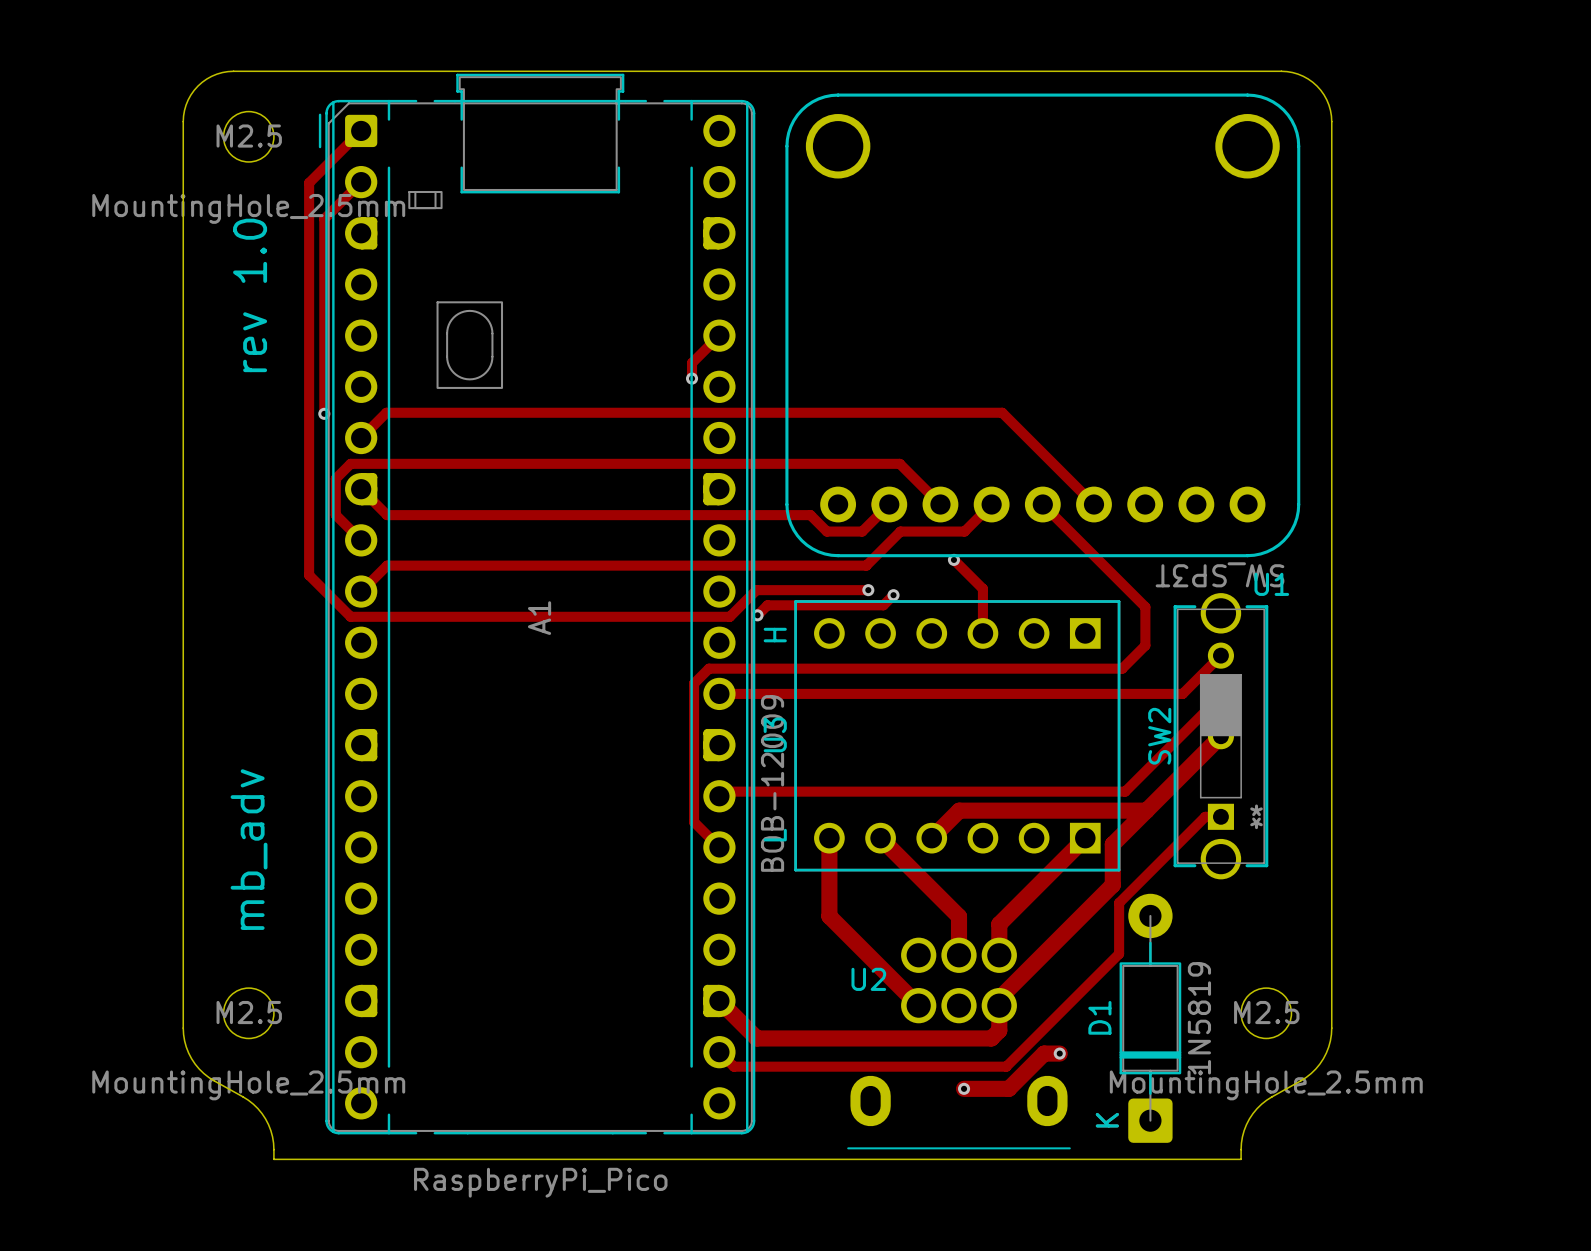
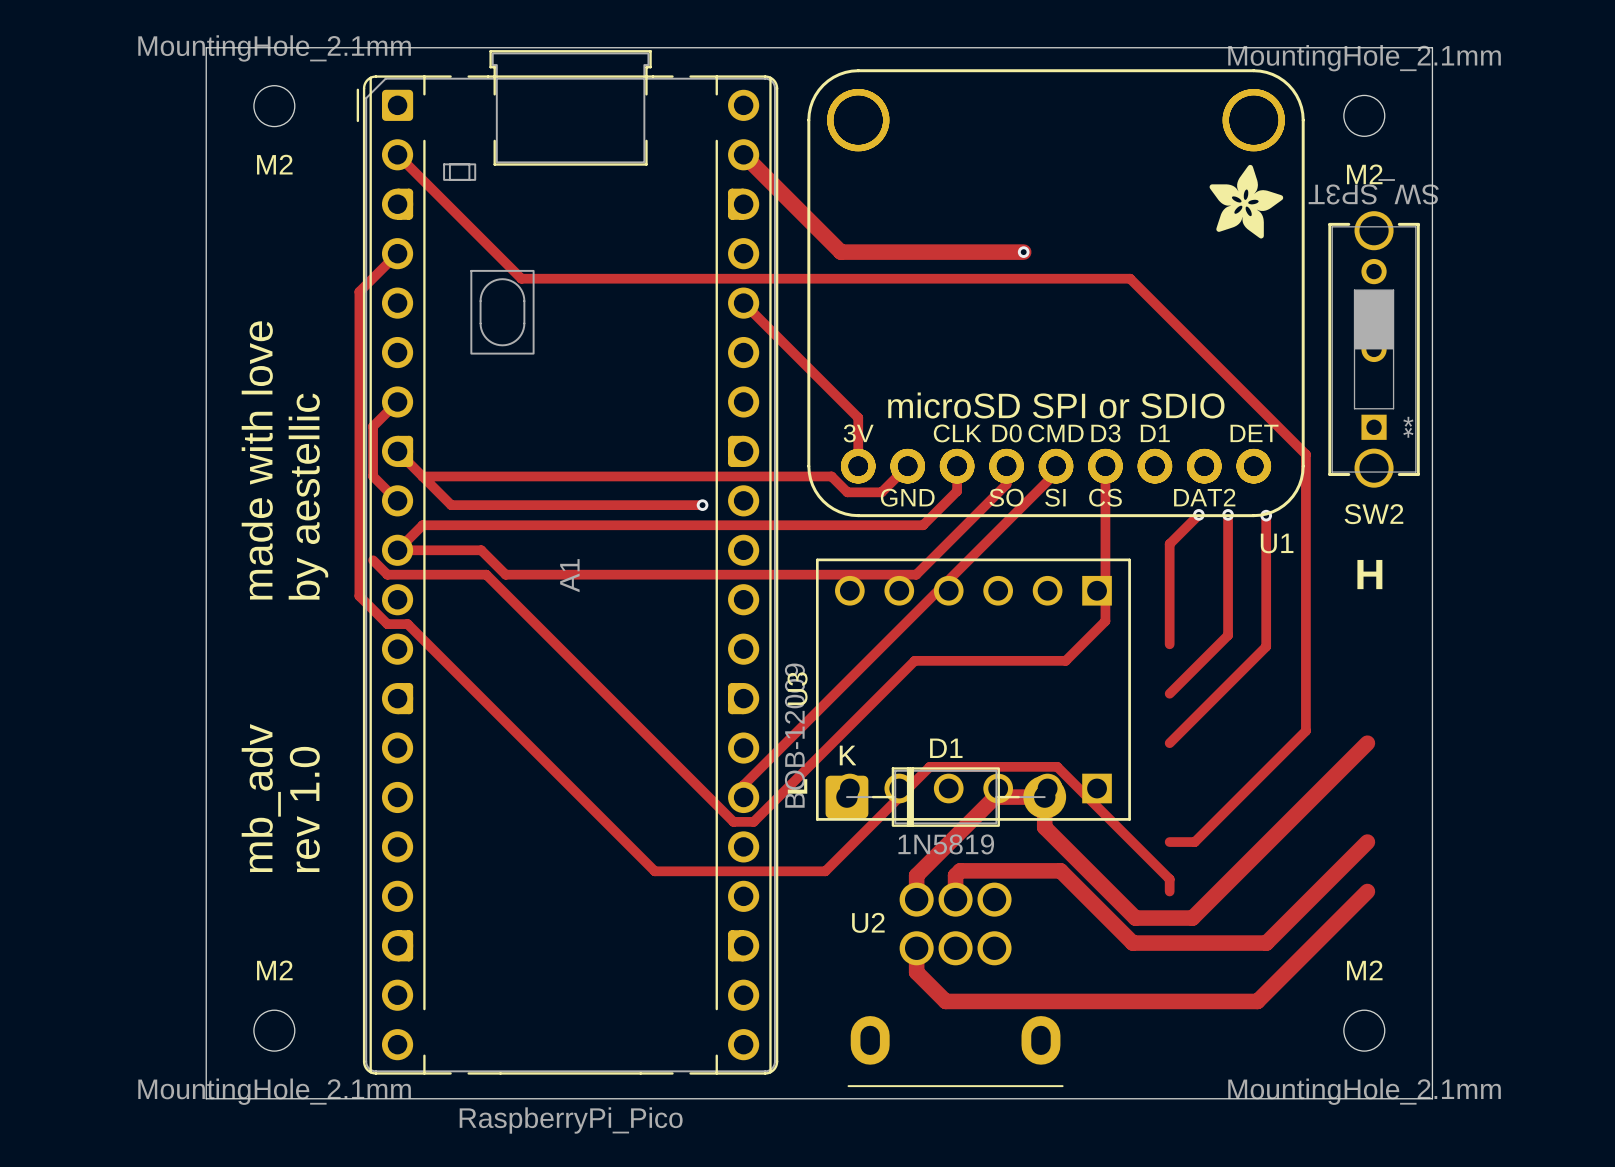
board edge: (233, 71) (211, 76) (198, 86) (186, 105) (183, 121) (183, 1028) (188, 1053) (199, 1069) (208, 1077) (248, 1100) (262, 1113) (272, 1136) (273, 1159) -> (274, 47) (206, 47) (206, 1098) (313, 1098)
board edge: (1281, 71) (1298, 74) (1317, 86) (1326, 99) (1331, 121) (1331, 1028) (1326, 1053) (1315, 1069) (1306, 1077) (1266, 1100) (1252, 1113) (1242, 1136) (1241, 1159) -> (1286, 47) (1432, 47) (1432, 1098) (1247, 1098)
track: (361, 130) (309, 182) (309, 575) (335, 601) -> none
M2: none -> MountingHole_2.1mm (274, 106)
M2.5: MountingHole_2.5mm (248, 136) -> none
M2: none -> MountingHole_2.1mm (1364, 115)
track: (361, 182) (324, 218) (324, 413) -> (397, 154) (521, 278) (1130, 278) (1305, 454) (1305, 730) (1194, 842) (1169, 842)
track: none -> (743, 154) (840, 252) (1023, 252)
via: none -> (1023, 252)
track: none -> (397, 253) (359, 291) (359, 596) (387, 624) (407, 624) (654, 871) (825, 871) (929, 766) (1057, 766) (1169, 879) (1169, 891)
text: rev 1.0 (250, 295) -> none
part: none -> (1056, 293)
track: (719, 335) (692, 363) (692, 378) -> (743, 303) (858, 417) (858, 466)
via: (692, 378) -> none
via: (324, 413) -> none
track: (361, 438) (386, 412) (1002, 412) (1094, 504) -> (486, 574) (733, 821) (753, 821) (914, 660) (1065, 660) (1105, 621) (1105, 466)
text: none -> made with love (257, 460)
track: (335, 478) (350, 463) (899, 463) (940, 504) -> (373, 441) (373, 426) (397, 401)
track: (991, 504) (964, 531) (900, 531) (866, 565) -> (957, 466) (957, 491) (923, 525) (885, 525)
track: (1042, 504) (1145, 607) (1145, 645) (1122, 668) (708, 668) (694, 683) (694, 822) (719, 847) -> (1056, 472) (743, 785) (743, 797)
text: none -> by aestellic (308, 496)
track: none -> (422, 476) (451, 505) (702, 505)
via: none -> (702, 505)
track: none -> (1198, 514) (1169, 544) (1169, 644)
via: none -> (1198, 514)
track: none -> (1228, 514) (1228, 635) (1169, 693)
via: none -> (1228, 514)
track: none -> (1266, 515) (1266, 646) (1169, 743)
via: none -> (1266, 515)
track: (953, 559) (982, 588) (982, 633) -> none
via: (953, 559) -> none
track: (868, 590) (756, 590) (729, 616) -> (1006, 466) (1006, 484) (916, 574) (753, 574)
via: (868, 590) -> none
track: (893, 595) (883, 605) (767, 605) (757, 615) -> none
via: (893, 595) -> none
via: (757, 615) -> none
track: (453, 616) (473, 616) -> (397, 550) (481, 550) (505, 574)
text: none -> H (1369, 574)
text: H (775, 635) -> none
track: (1220, 655) (1182, 693) (719, 693) -> none
track: (1220, 695) (1125, 791) (724, 791) (719, 796) -> none
SW2 name rotation: 0° (1159, 736) -> 90° clockwise (1373, 514)
SW2 name position: SW2 (1159, 736) -> SW2 (1373, 514)
track: (1220, 736) (1112, 844) (1112, 885) (999, 998) (999, 1030) (991, 1038) (756, 1038) (719, 1000) -> none
SW2 position: (1220, 736) -> (1374, 349)
track: none -> (1367, 743) (1192, 918) (1135, 918) (1044, 827) (1044, 797) (995, 797) (916, 875) (916, 899)
track: (1146, 810) (959, 810) (931, 838) -> none
track: (1220, 816) (1205, 816) (1119, 902) (1119, 953) (1006, 1066) (733, 1066) (719, 1052) -> none
track: (829, 838) (829, 916) (918, 1005) -> none
track: (880, 838) (959, 916) (959, 955) -> none
track: (1085, 838) (999, 924) (999, 955) -> none
text: none -> rev 1.0 (304, 809)
text position: mb_adv (249, 849) -> mb_adv (261, 798)
track: none -> (1367, 842) (1266, 943) (1132, 943) (1060, 870) (960, 870) (955, 875) (955, 899)
track: none -> (1367, 891) (1257, 1001) (945, 1001) (916, 972) (916, 948)
M2.5: MountingHole_2.5mm (248, 1013) -> none
M2.5: MountingHole_2.5mm (1266, 1013) -> none
D1 rotation: 0° (1150, 1018) -> 90° clockwise (945, 797)
D1 position: (1150, 1018) -> (945, 797)
U2 position: (959, 1043) -> (955, 984)
track: (1059, 1053) (1044, 1053) (1008, 1088) (964, 1088) -> none
via: (1059, 1053) -> none
M2: none -> MountingHole_2.1mm (274, 1030)
via: (964, 1088) -> none
M2: none -> MountingHole_2.1mm (1364, 1030)

